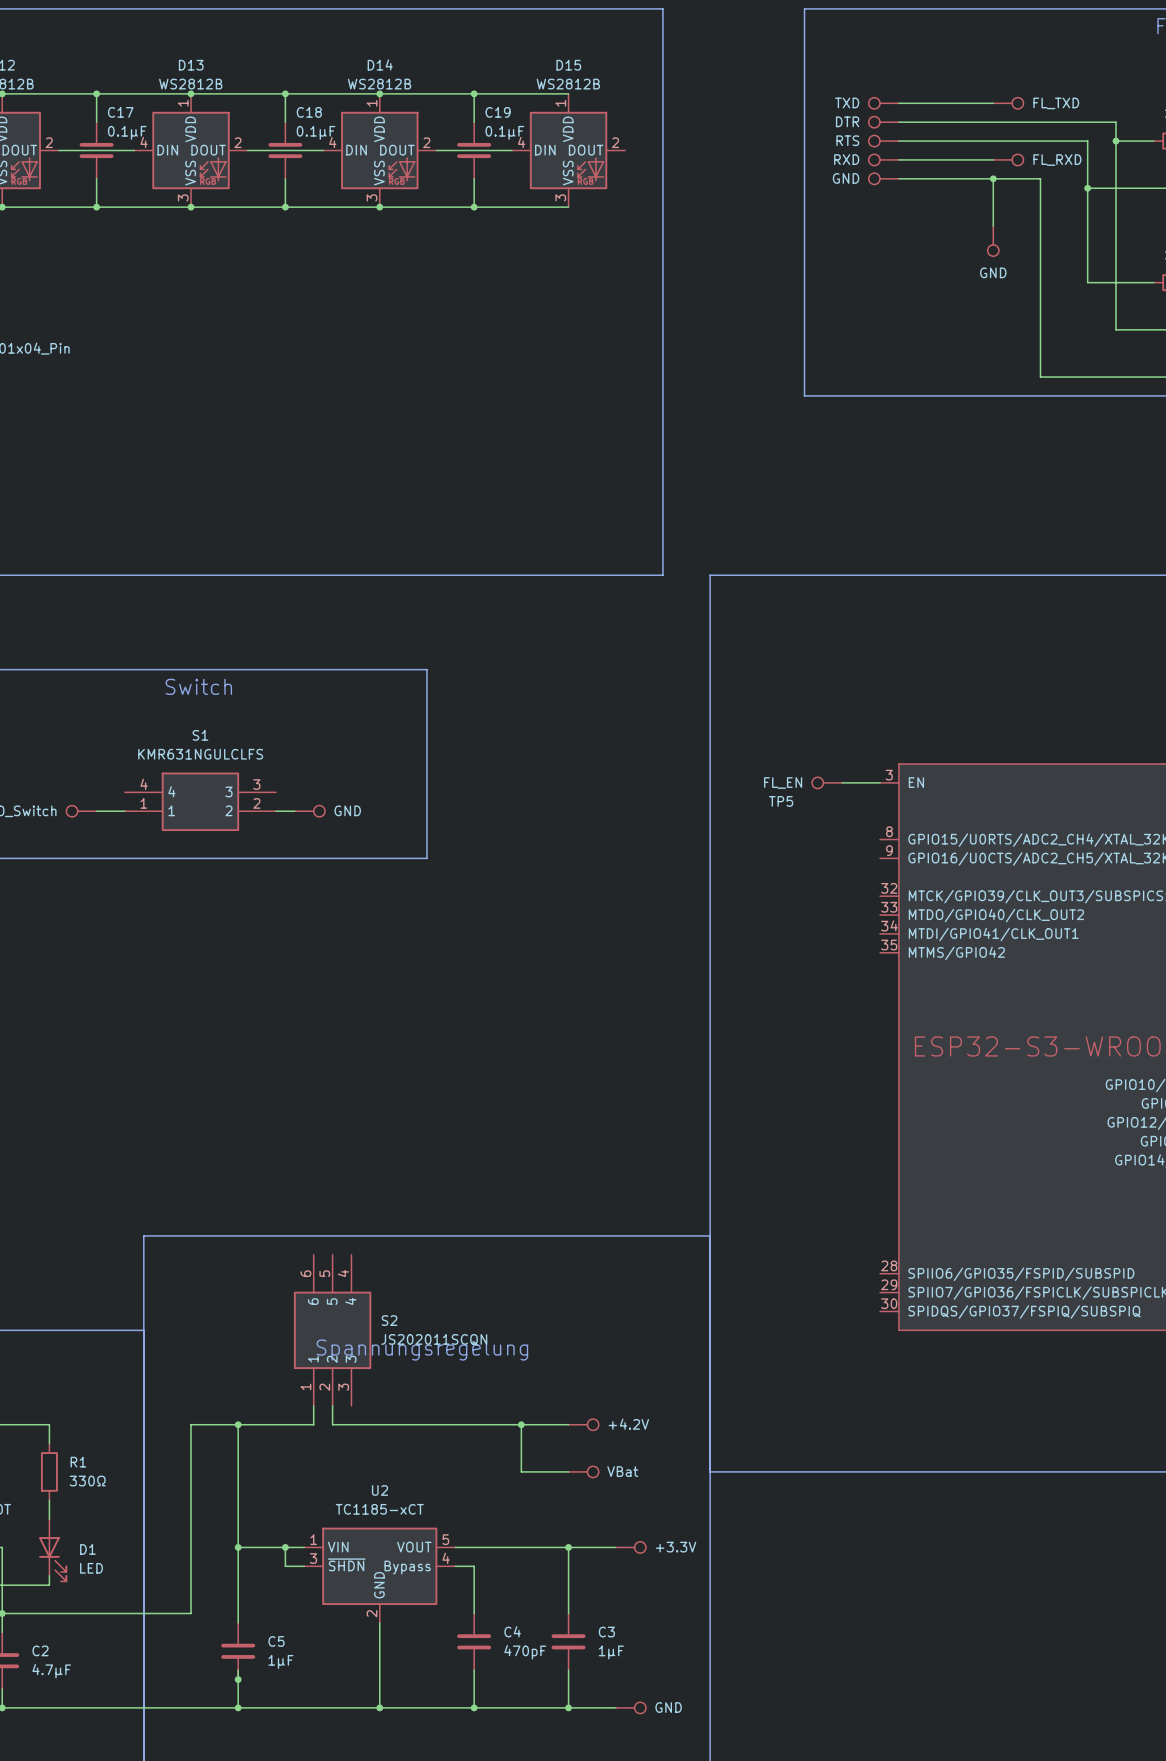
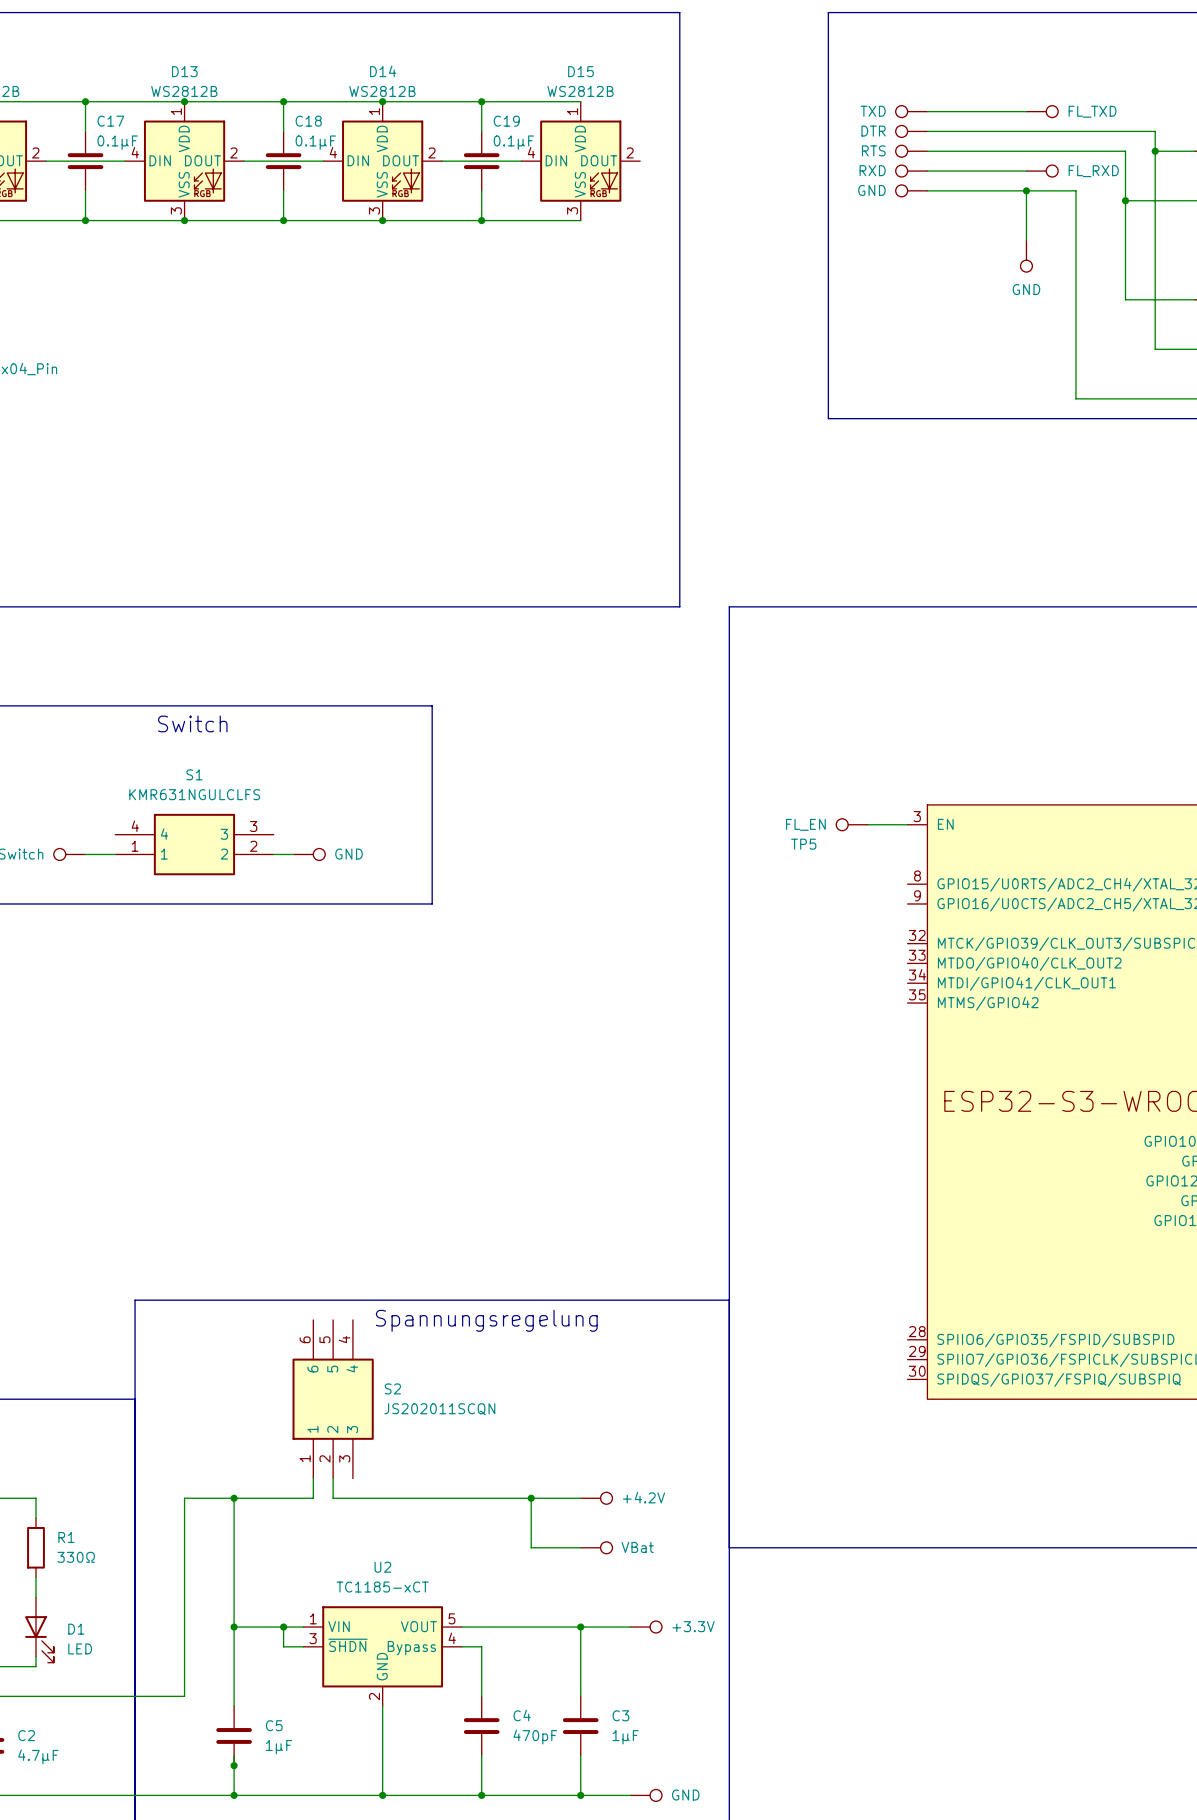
text position: Spannungsregelung (422, 1350) -> Spannungsregelung (486, 1320)

